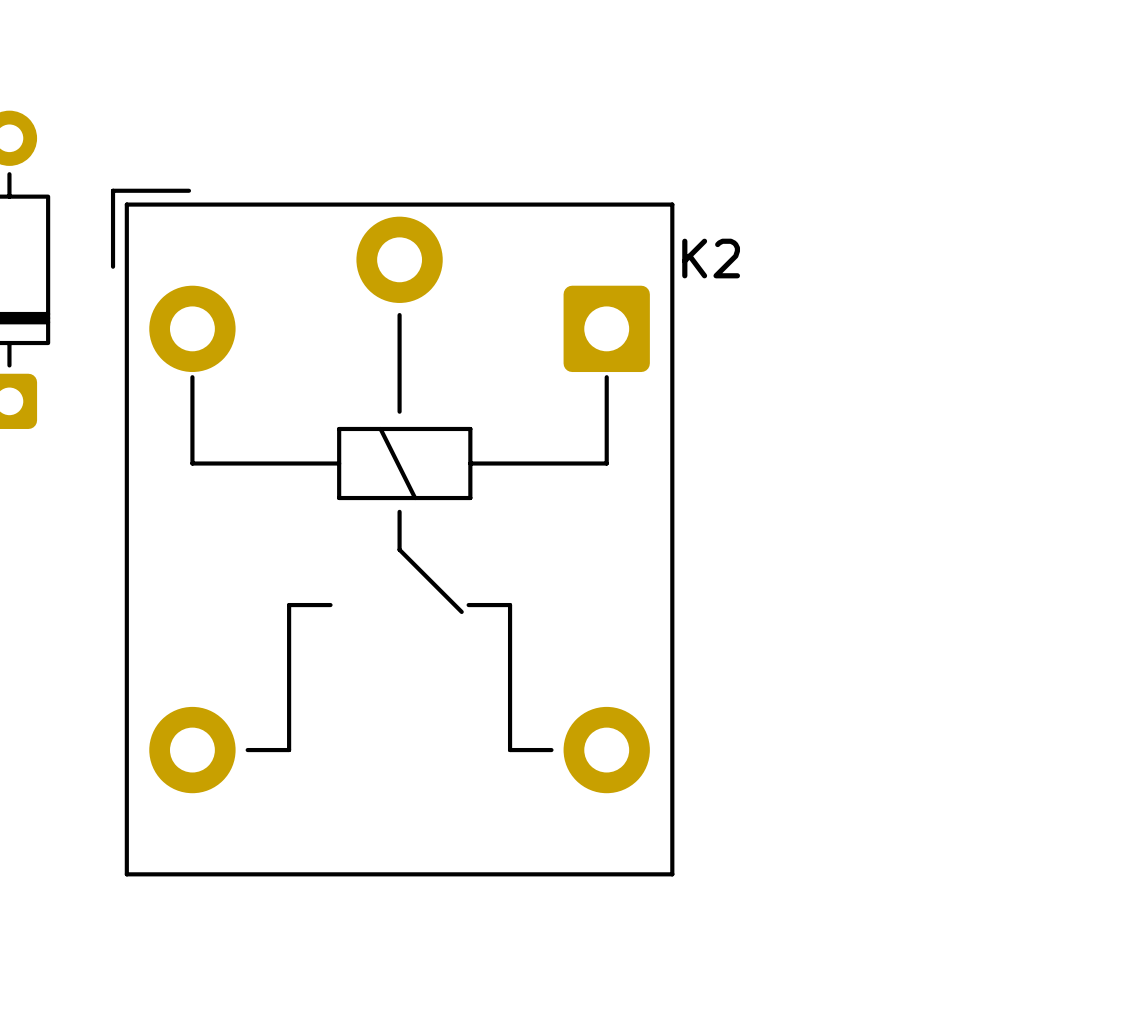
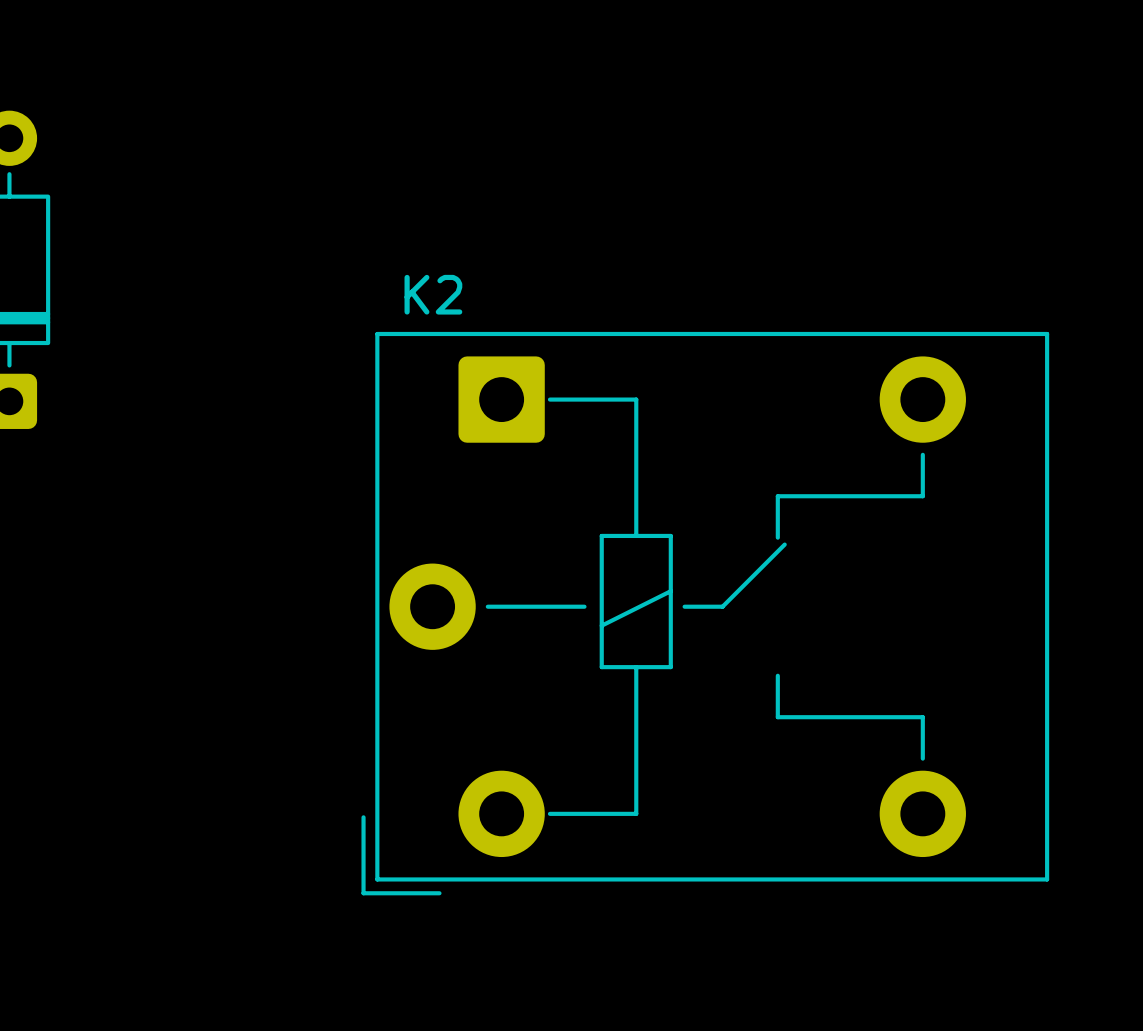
K2 rotation: 0° (392, 532) -> 90° counterclockwise (705, 613)

